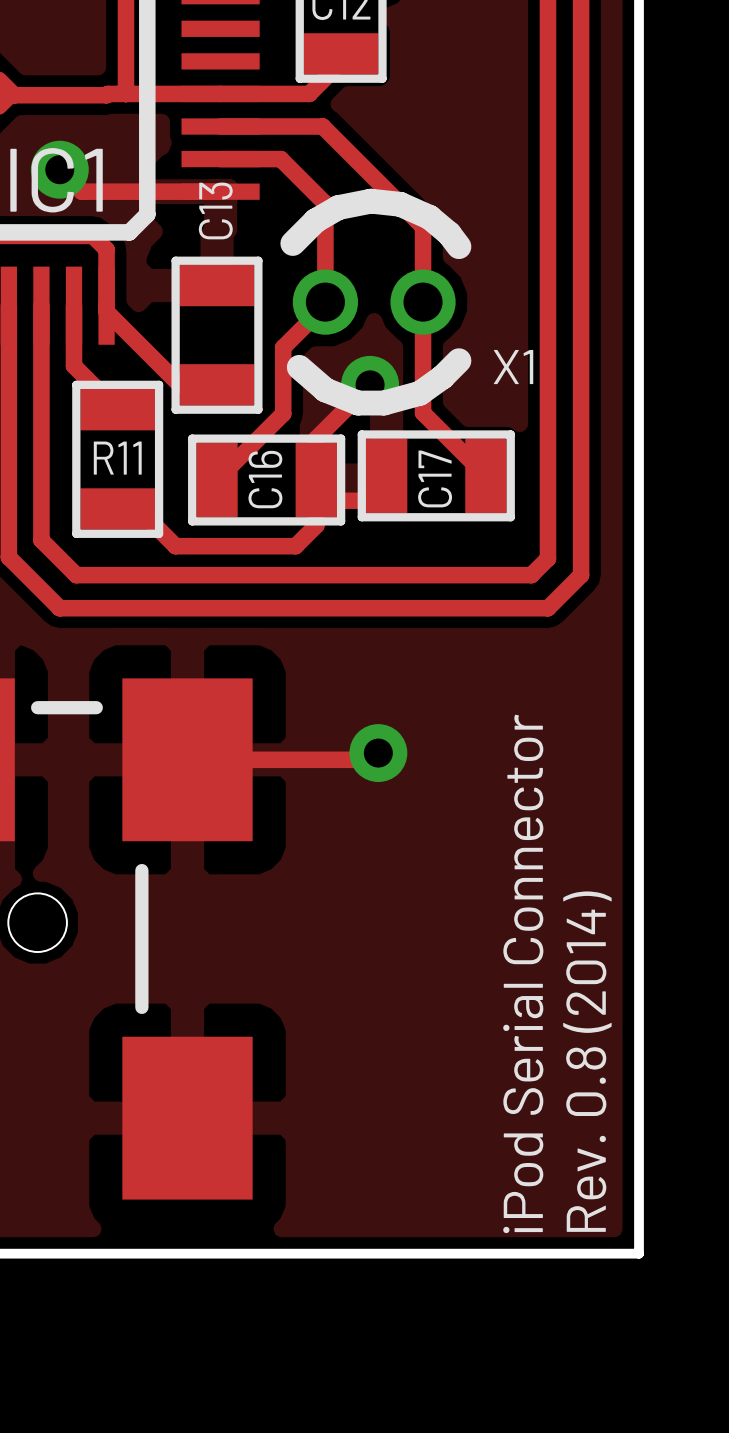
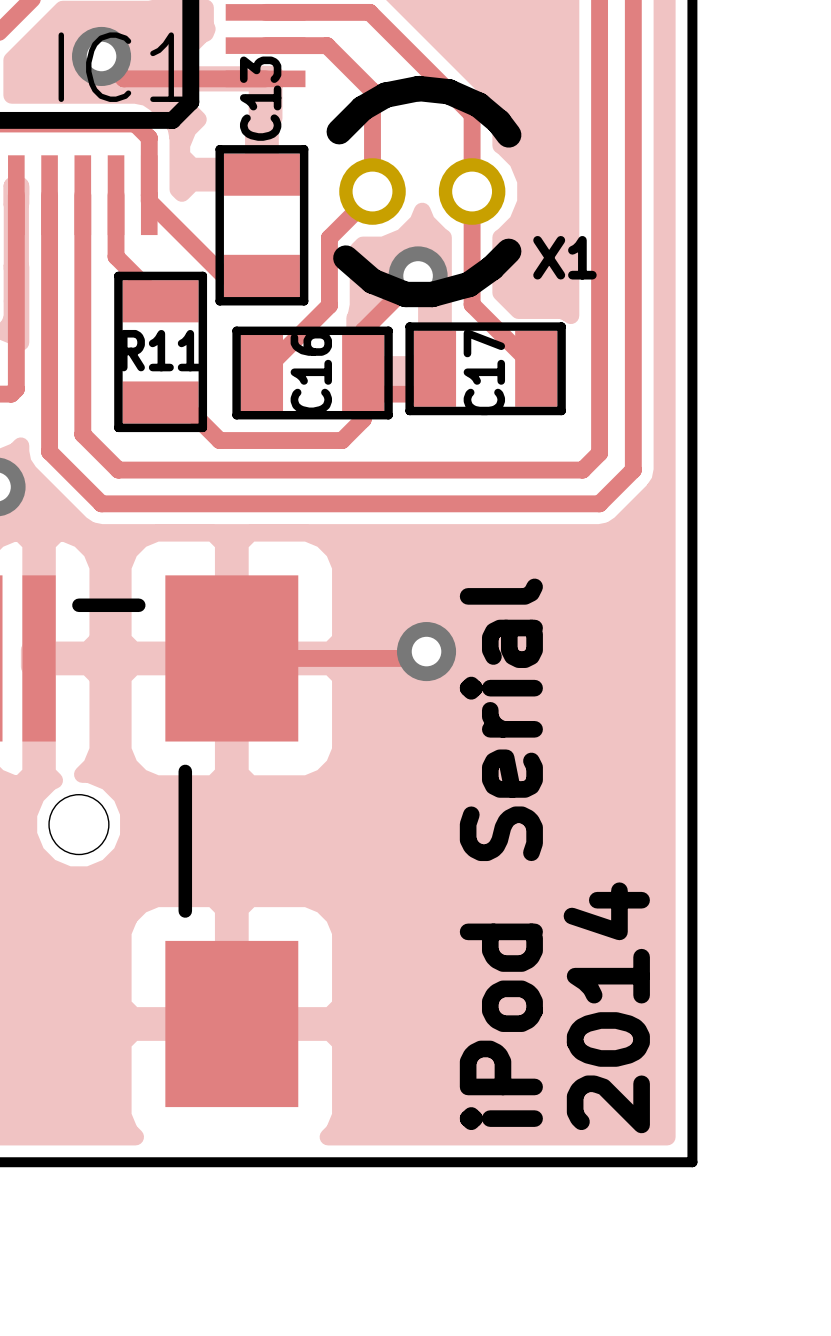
text: iPod Serial Connector (523, 973) -> iPod Serial (501, 854)
text: Rev. 0.8 (2014) (587, 1061) -> none
text: none -> 2014 (606, 1007)

